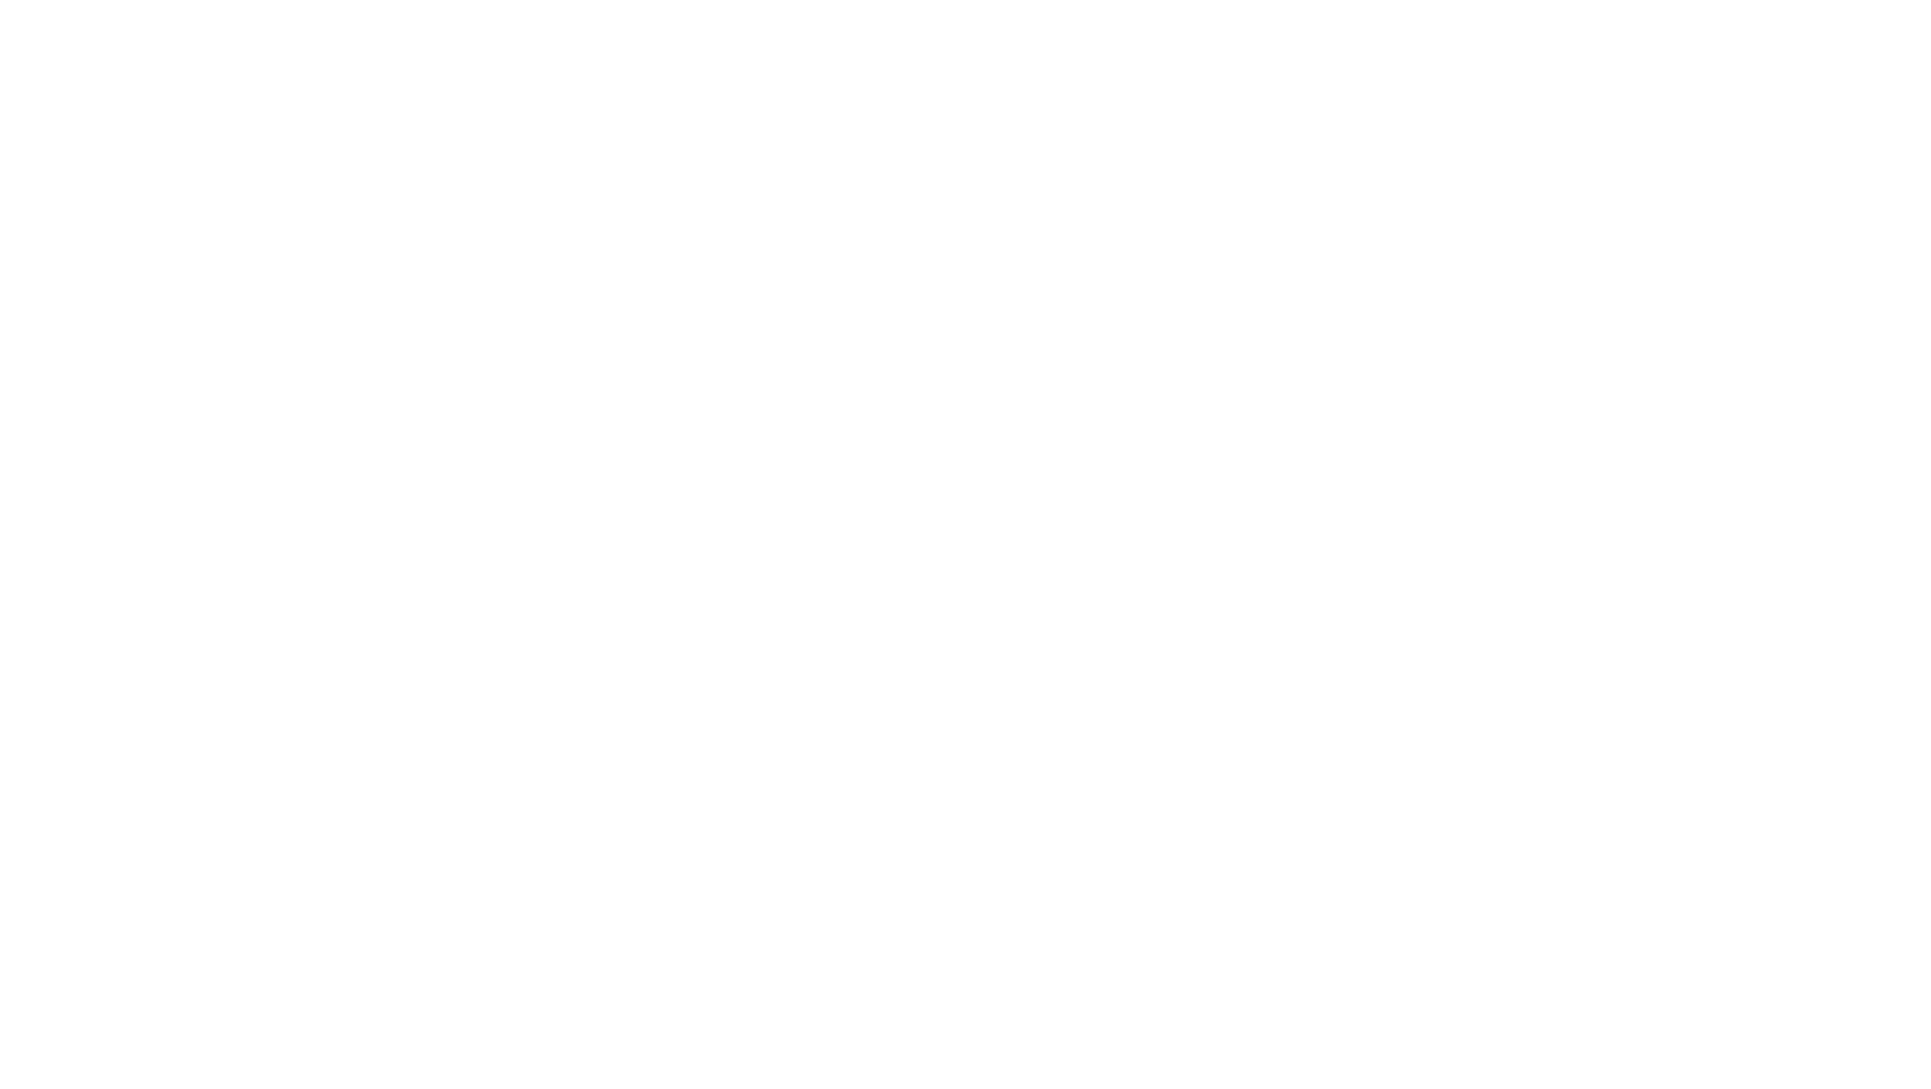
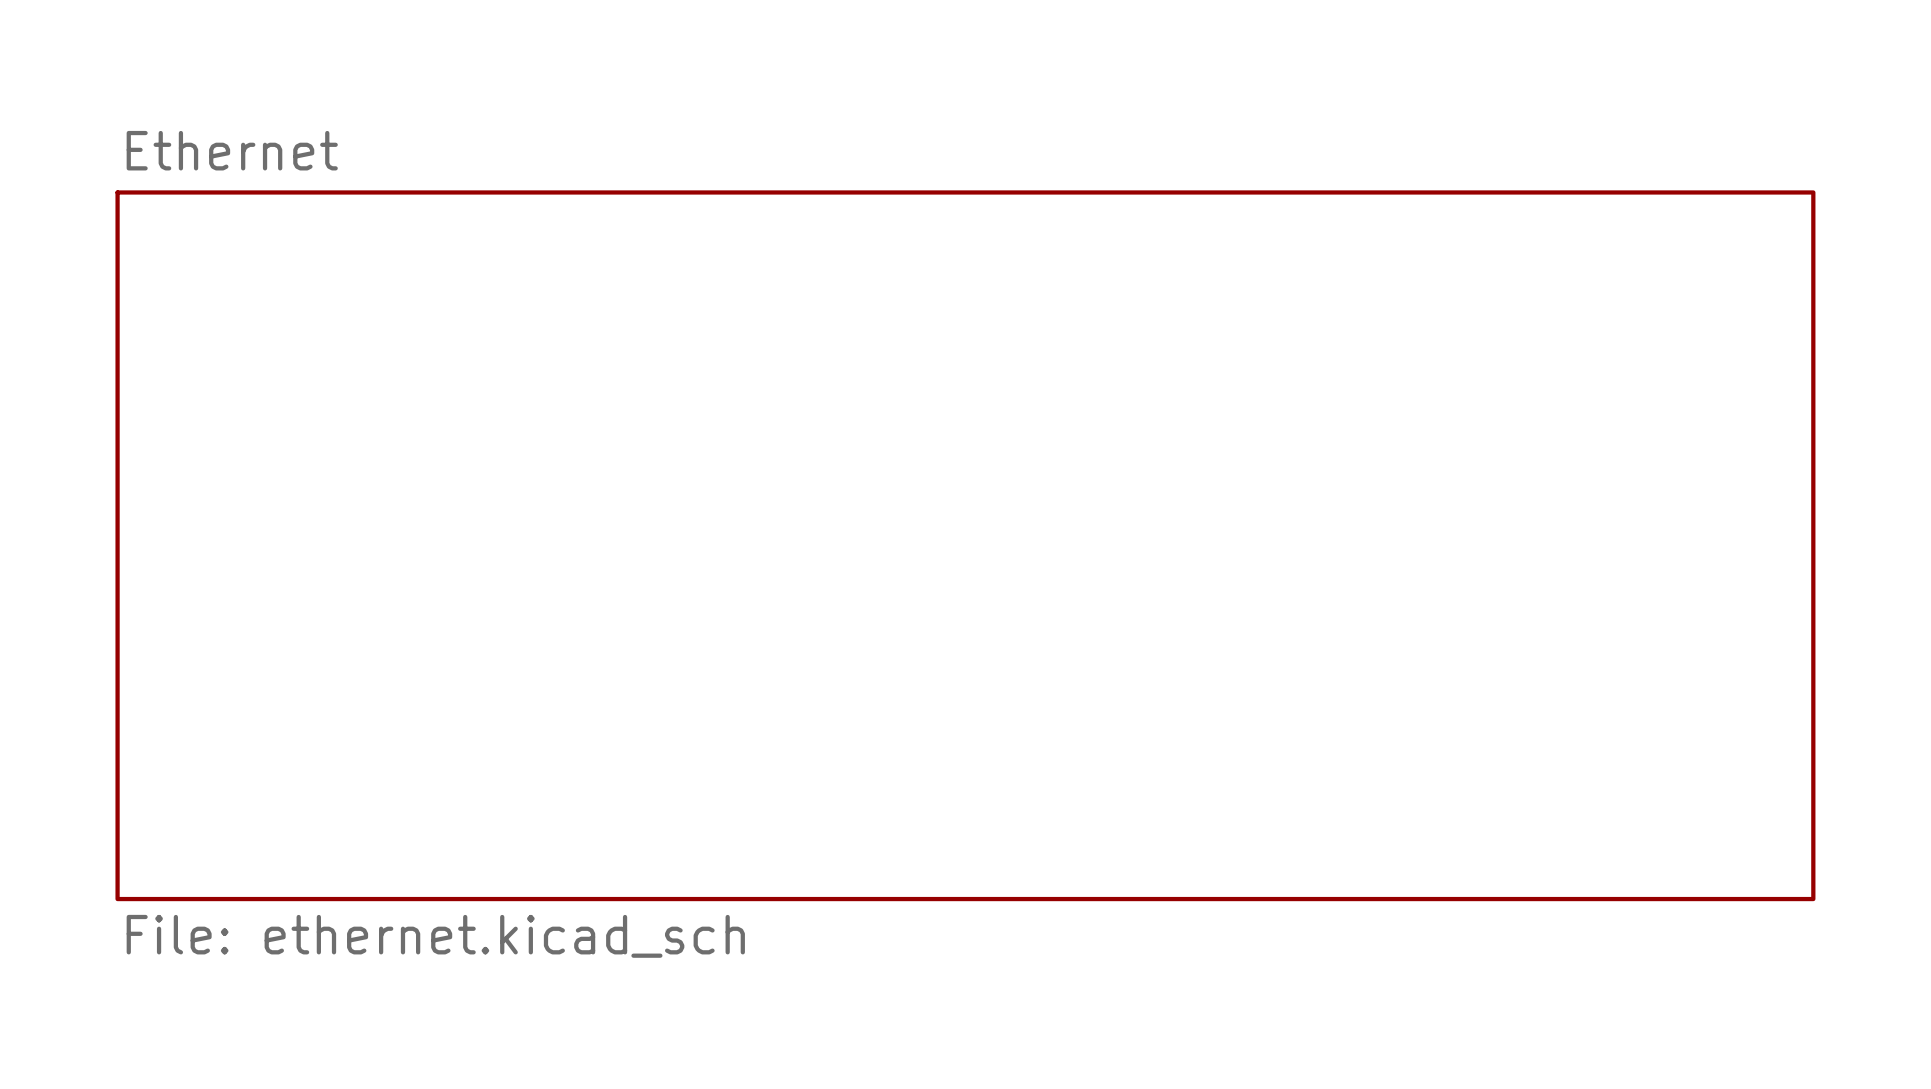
sheet Ethernet: none -> File: ethernet.kicad_sch (965, 545)

